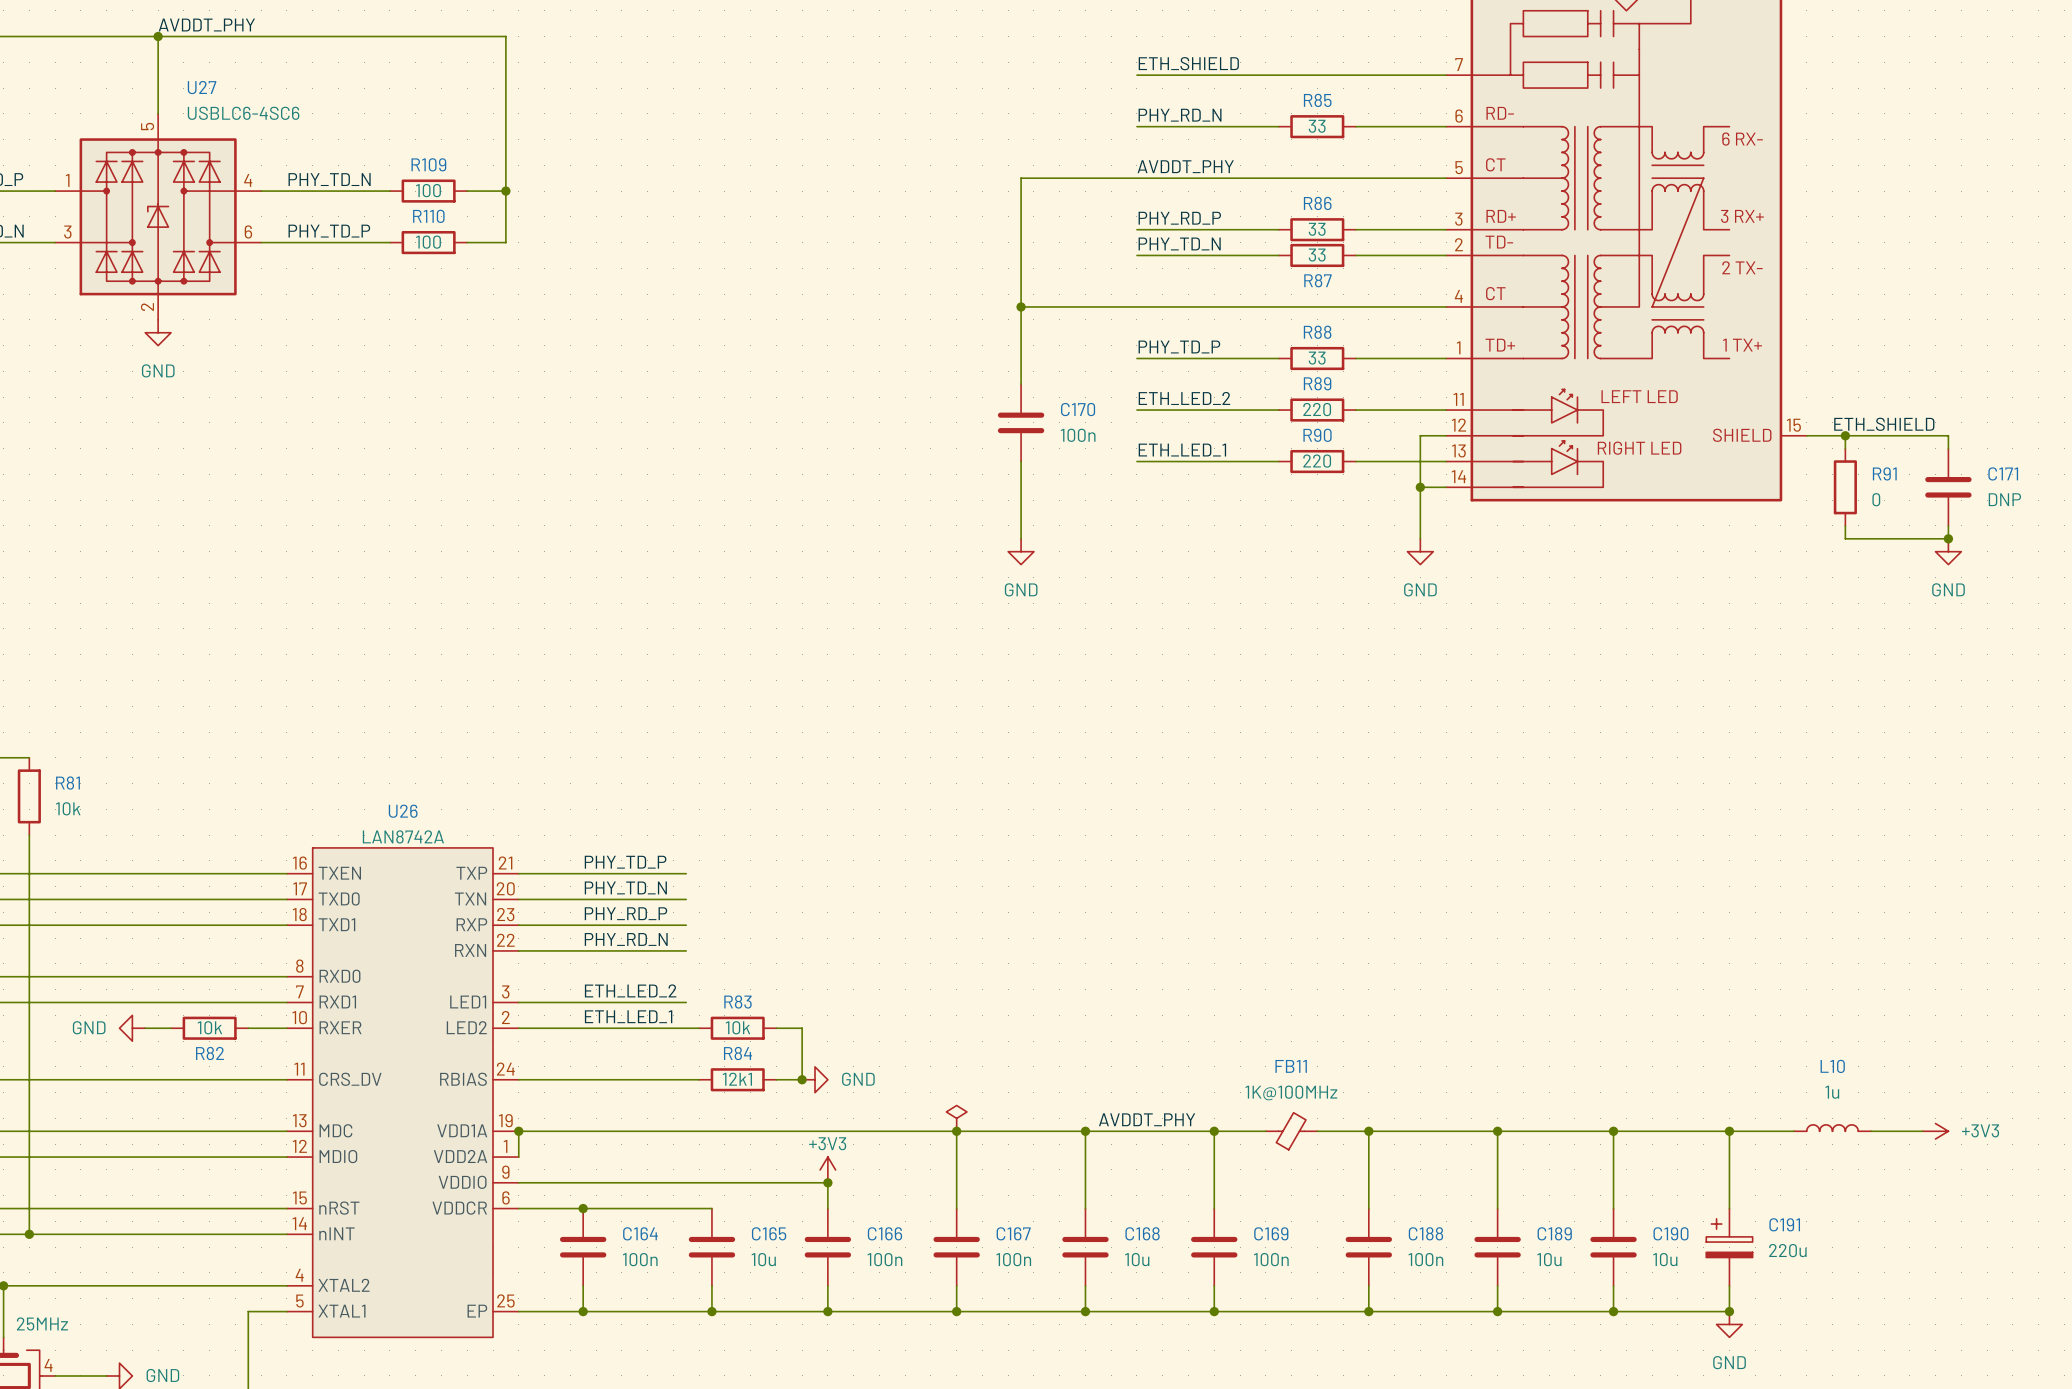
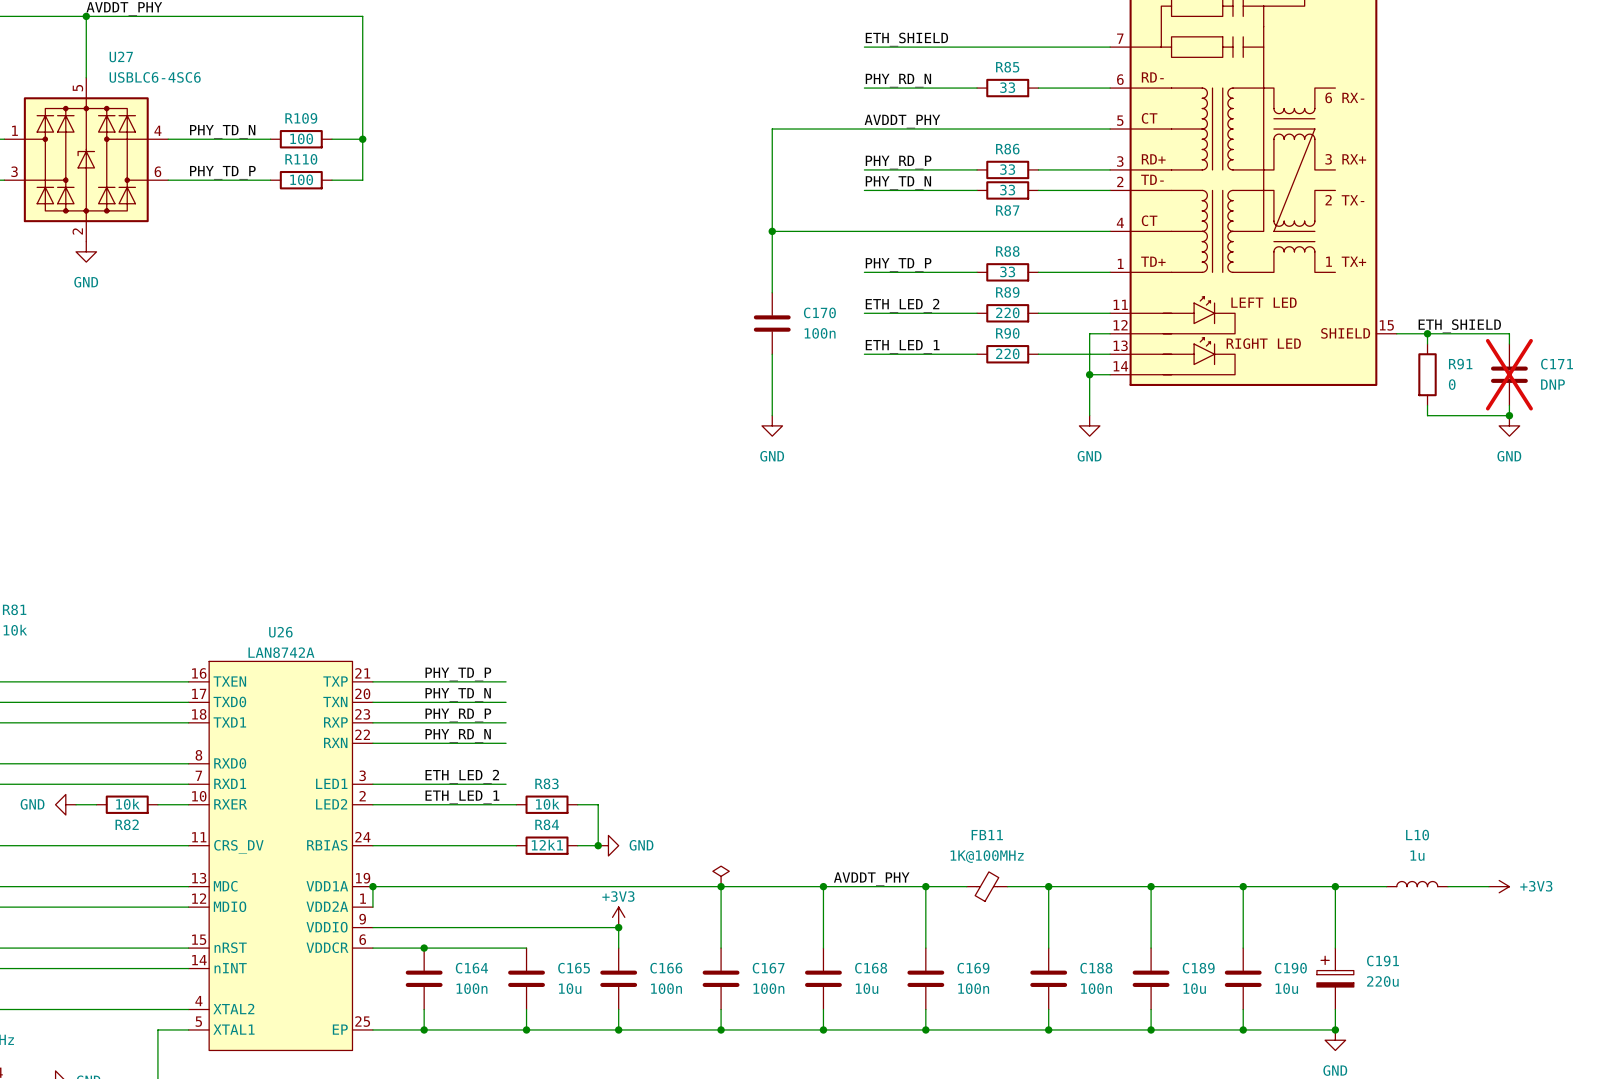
C171 do-not-place cross: none -> (1509, 374)

